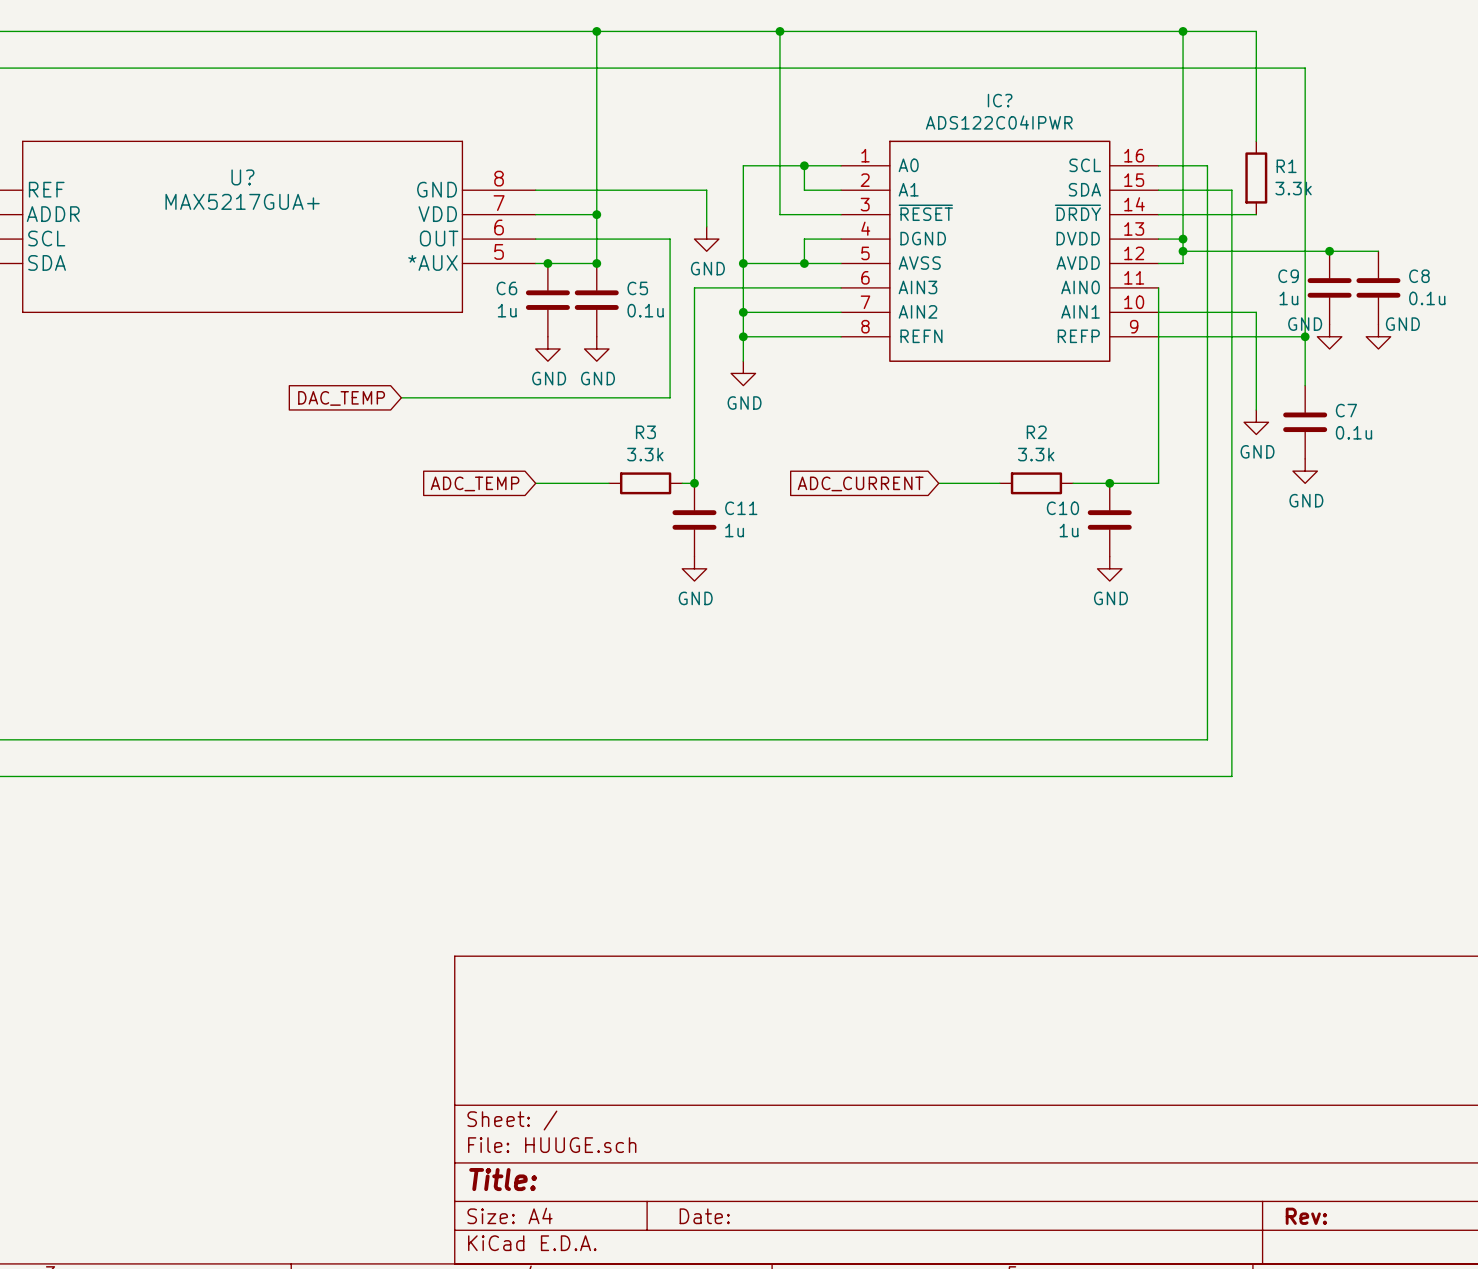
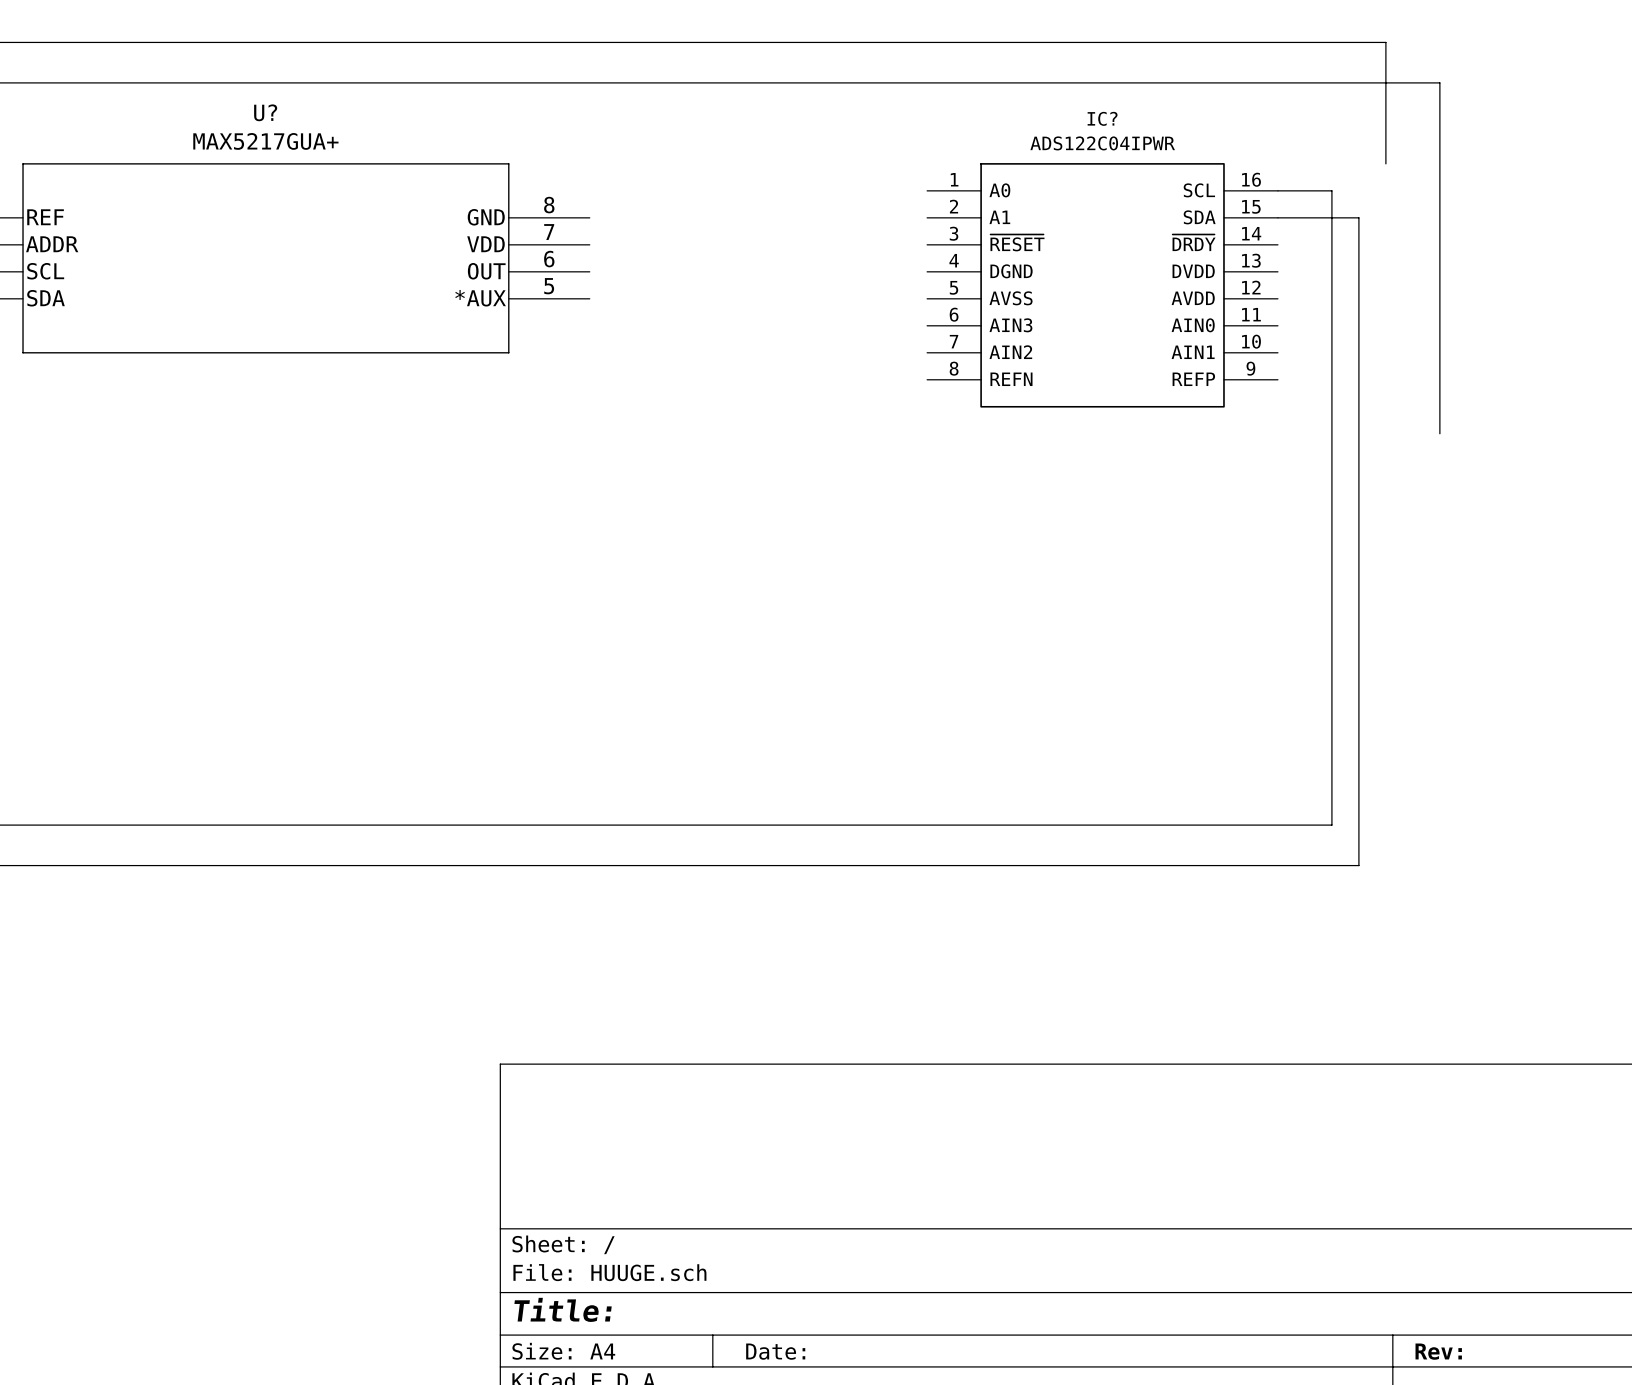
wire: (596, 31) (596, 263) (535, 263) -> none
junction: (596, 31) -> none
wire: (779, 31) (779, 214) (841, 214) -> none
junction: (779, 31) -> none
wire: (1183, 31) (1183, 263) (1158, 263) -> none
junction: (1183, 31) -> none
wire: (804, 165) (804, 190) (841, 190) -> none
junction: (804, 165) -> none
wire: (841, 165) (743, 165) (743, 361) -> none
U? name position: U? (242, 177) -> U? (265, 112)
R1: 3.3k (1256, 177) -> none
wire: (535, 190) (706, 190) (706, 226) -> none
U? value position: MAX5217GUA+ (242, 201) -> MAX5217GUA+ (265, 141)
wire: (535, 214) (596, 214) -> none
junction: (596, 214) -> none
wire: (1158, 214) (1256, 214) -> none
wire: (535, 239) (670, 239) (670, 397) (401, 397) -> none
power symbol: GND (706, 239) -> none
wire: (841, 239) (804, 239) (804, 263) -> none
wire: (1158, 239) (1183, 239) -> none
junction: (1183, 239) -> none
wire: (1183, 251) (1378, 251) -> none
junction: (1183, 251) -> none
junction: (1329, 251) -> none
junction: (547, 263) -> none
junction: (596, 263) -> none
wire: (743, 263) (841, 263) -> none
junction: (743, 263) -> none
junction: (804, 263) -> none
wire: (841, 287) (694, 287) (694, 483) (682, 483) -> none
wire: (1158, 287) (1158, 483) (1073, 483) -> none
C9: 1u (1329, 287) -> none
C8: 0.1u (1378, 287) -> none
C6: 1u (547, 300) -> none
C5: 0.1u (596, 300) -> none
wire: (743, 312) (841, 312) -> none
junction: (743, 312) -> none
wire: (1158, 312) (1256, 312) (1256, 410) -> none
wire: (743, 336) (841, 336) -> none
junction: (743, 336) -> none
wire: (1158, 336) (1305, 336) -> none
junction: (1305, 336) -> none
power symbol: GND (1329, 336) -> none
power symbol: GND (1378, 336) -> none
power symbol: GND (547, 348) -> none
power symbol: GND (596, 348) -> none
power symbol: GND (743, 373) -> none
global label: DAC_TEMP (341, 398) -> none
power symbol: GND (1256, 422) -> none
C7: 0.1u (1305, 422) -> none
power symbol: GND (1305, 471) -> none
global label: ADC_TEMP (475, 483) -> none
wire: (535, 483) (608, 483) -> none
R3: 3.3k (645, 483) -> none
junction: (694, 483) -> none
global label: ADC_CURRENT (860, 483) -> none
wire: (938, 483) (999, 483) -> none
R2: 3.3k (1036, 483) -> none
junction: (1109, 483) -> none
C11: 1u (694, 519) -> none
C10: 1u (1109, 519) -> none
power symbol: GND (694, 568) -> none
power symbol: GND (1109, 568) -> none

